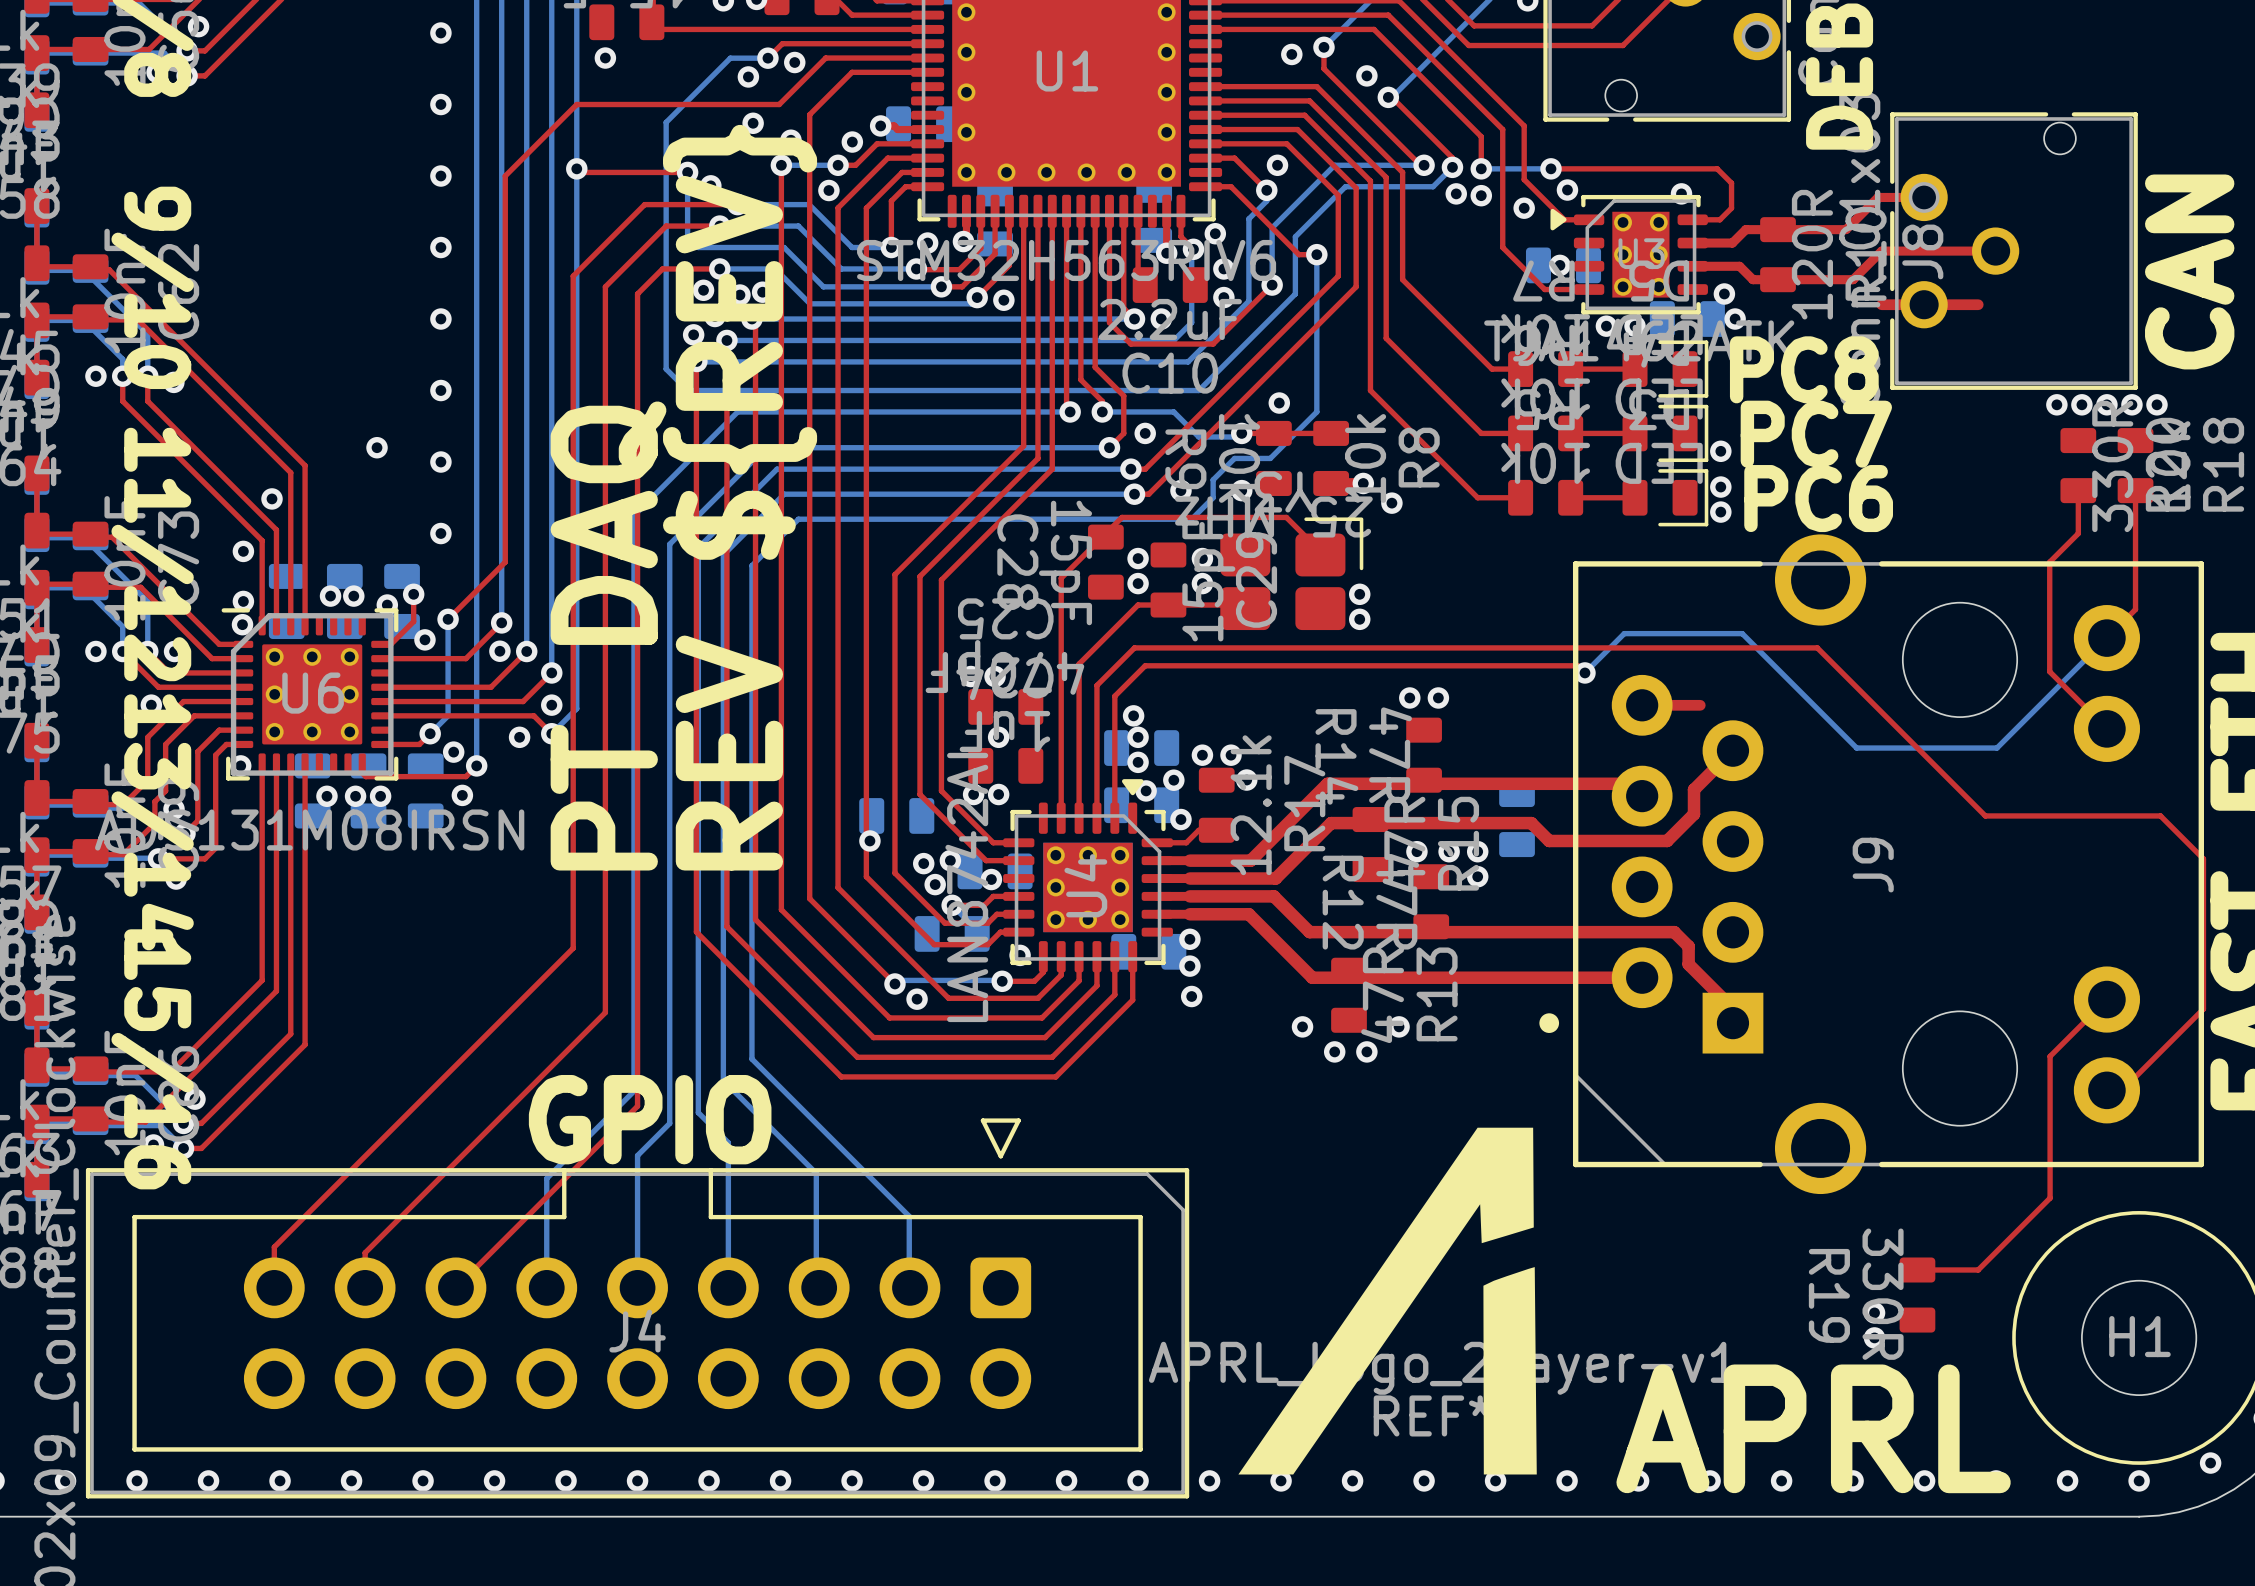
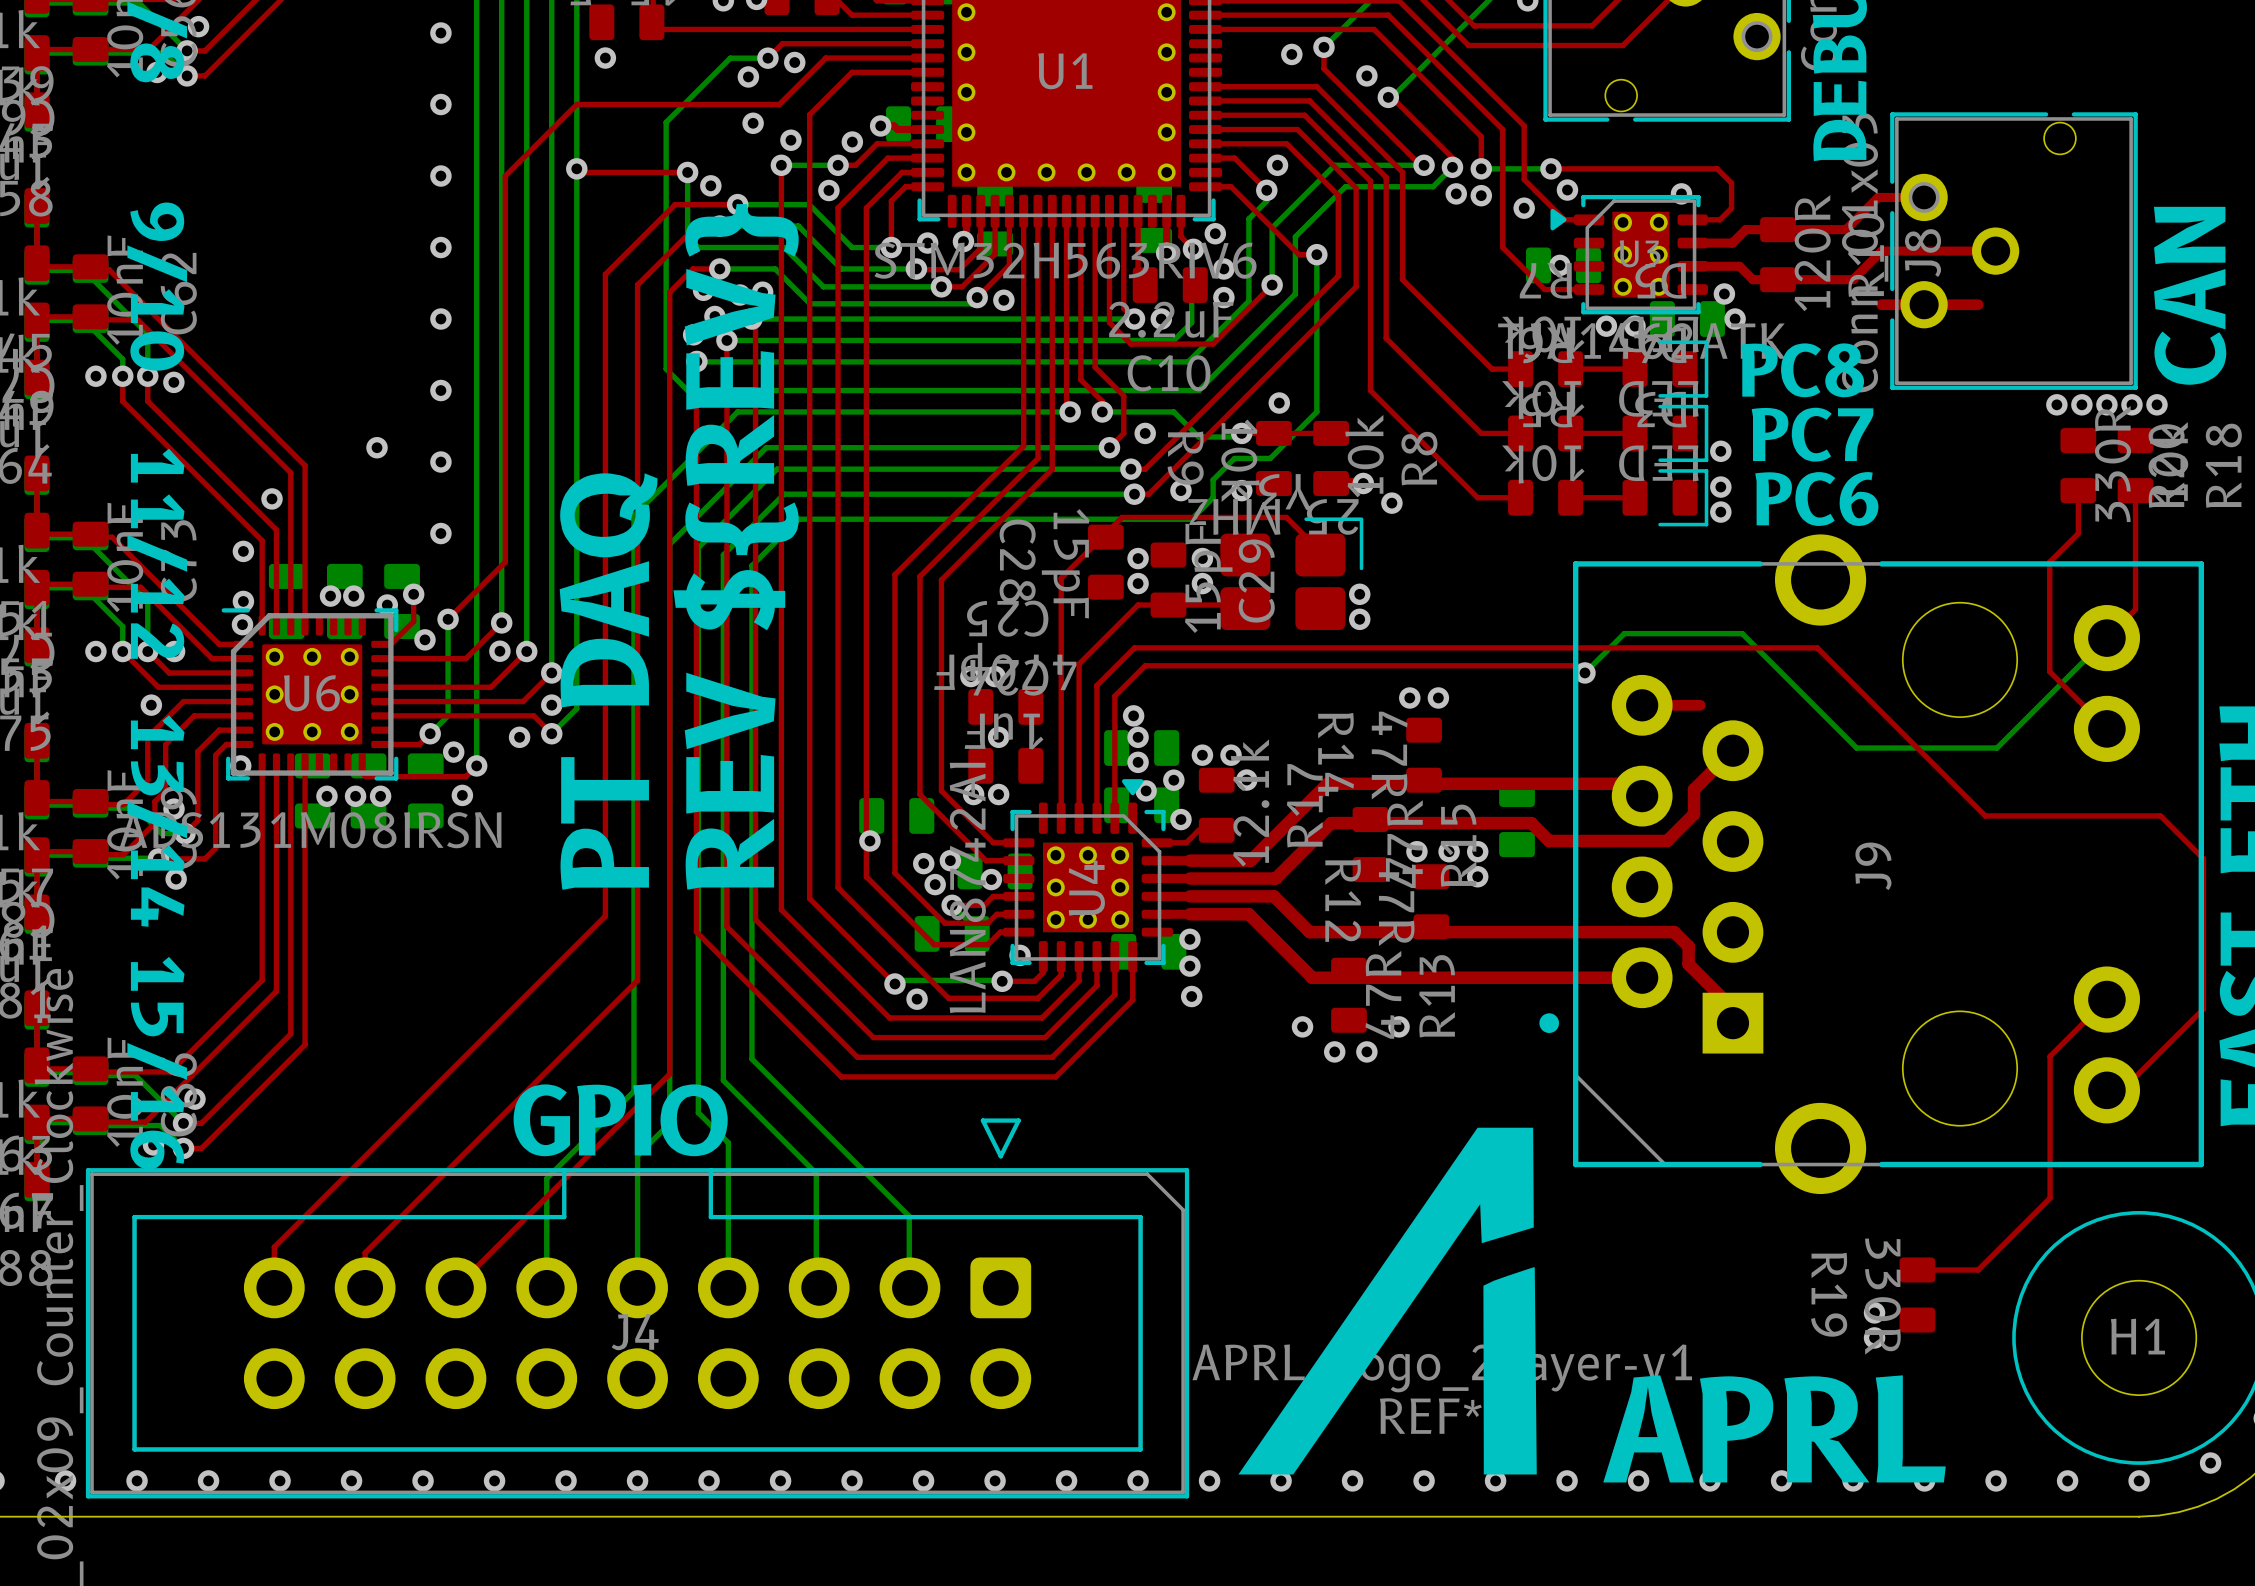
top track: (675, 204) (644, 204) (573, 276) (573, 948) -> none
top track: (696, 226) (666, 226) (605, 286) -> (675, 204) (605, 274) (605, 286)
top track: (692, 268) (662, 268) (637, 293) -> (696, 226) (637, 285) (637, 293)
top track: none -> (692, 268) (669, 292) (669, 1074) (637, 1106)
top track: (605, 916) (605, 1012) -> (605, 916) (573, 948)
top track: (637, 980) (637, 1106) -> (637, 980) (605, 1012)

